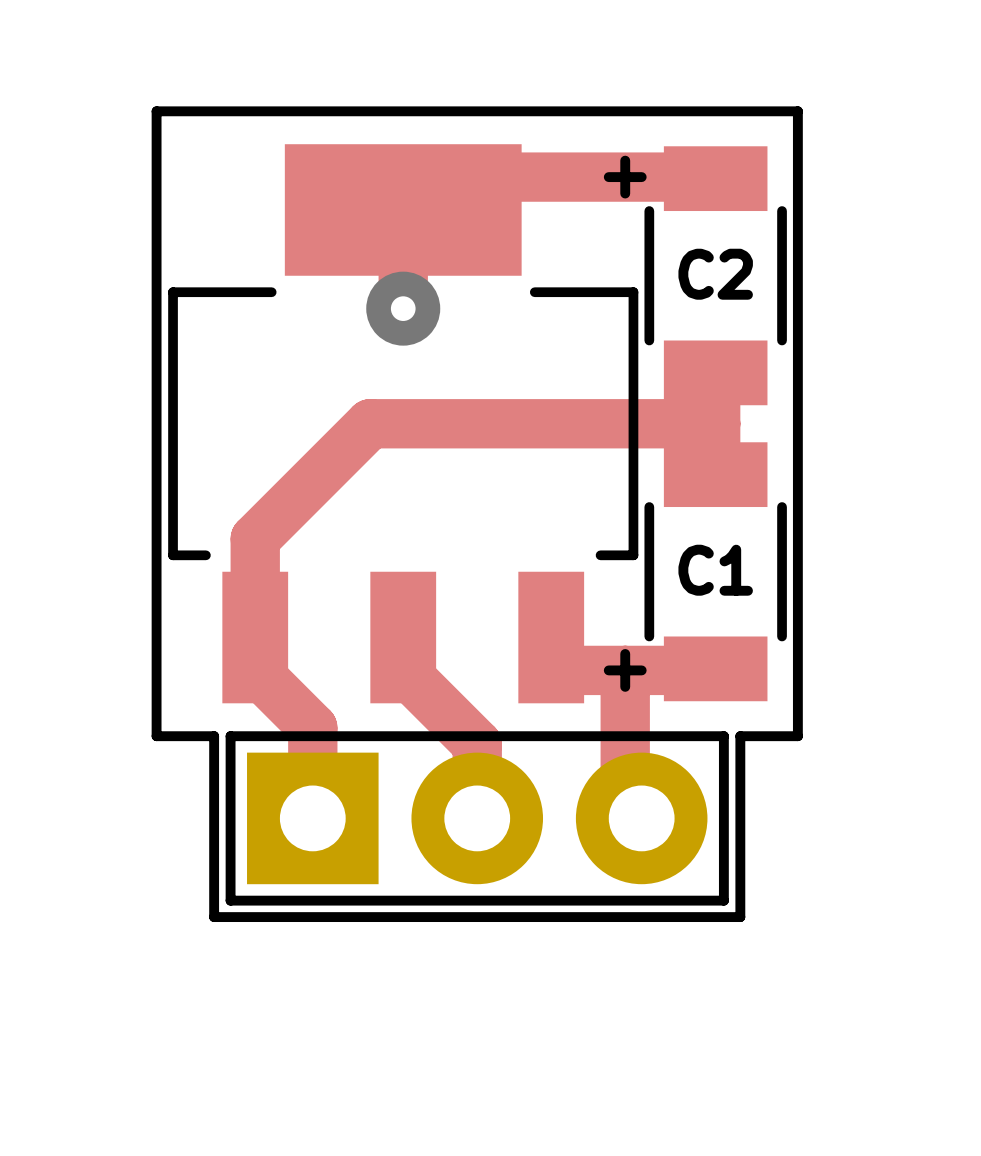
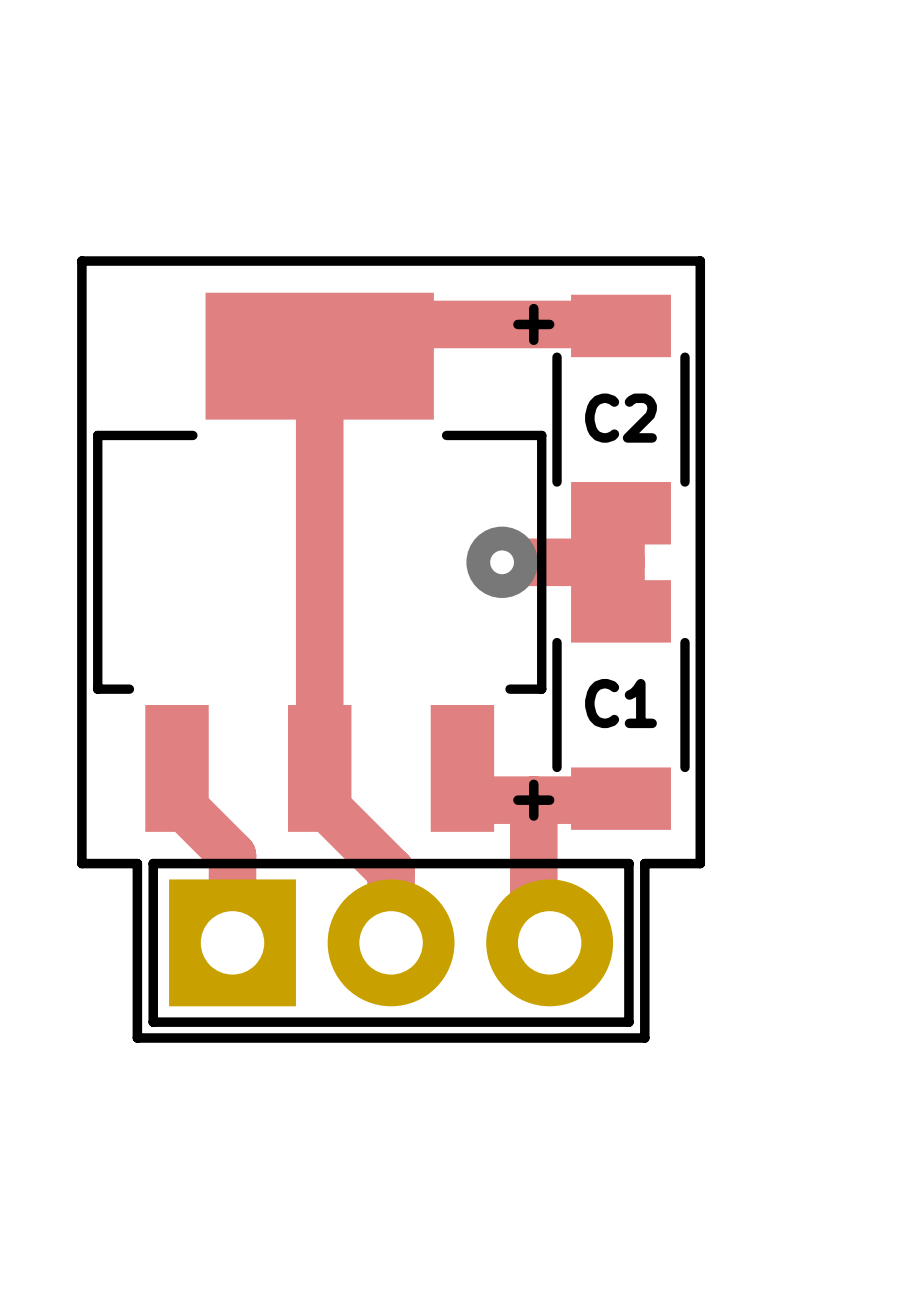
track: none -> (319, 451) (319, 800)
via position: (403, 308) -> (502, 562)
track: (592, 423) (370, 423) (255, 538) (255, 637) -> none

